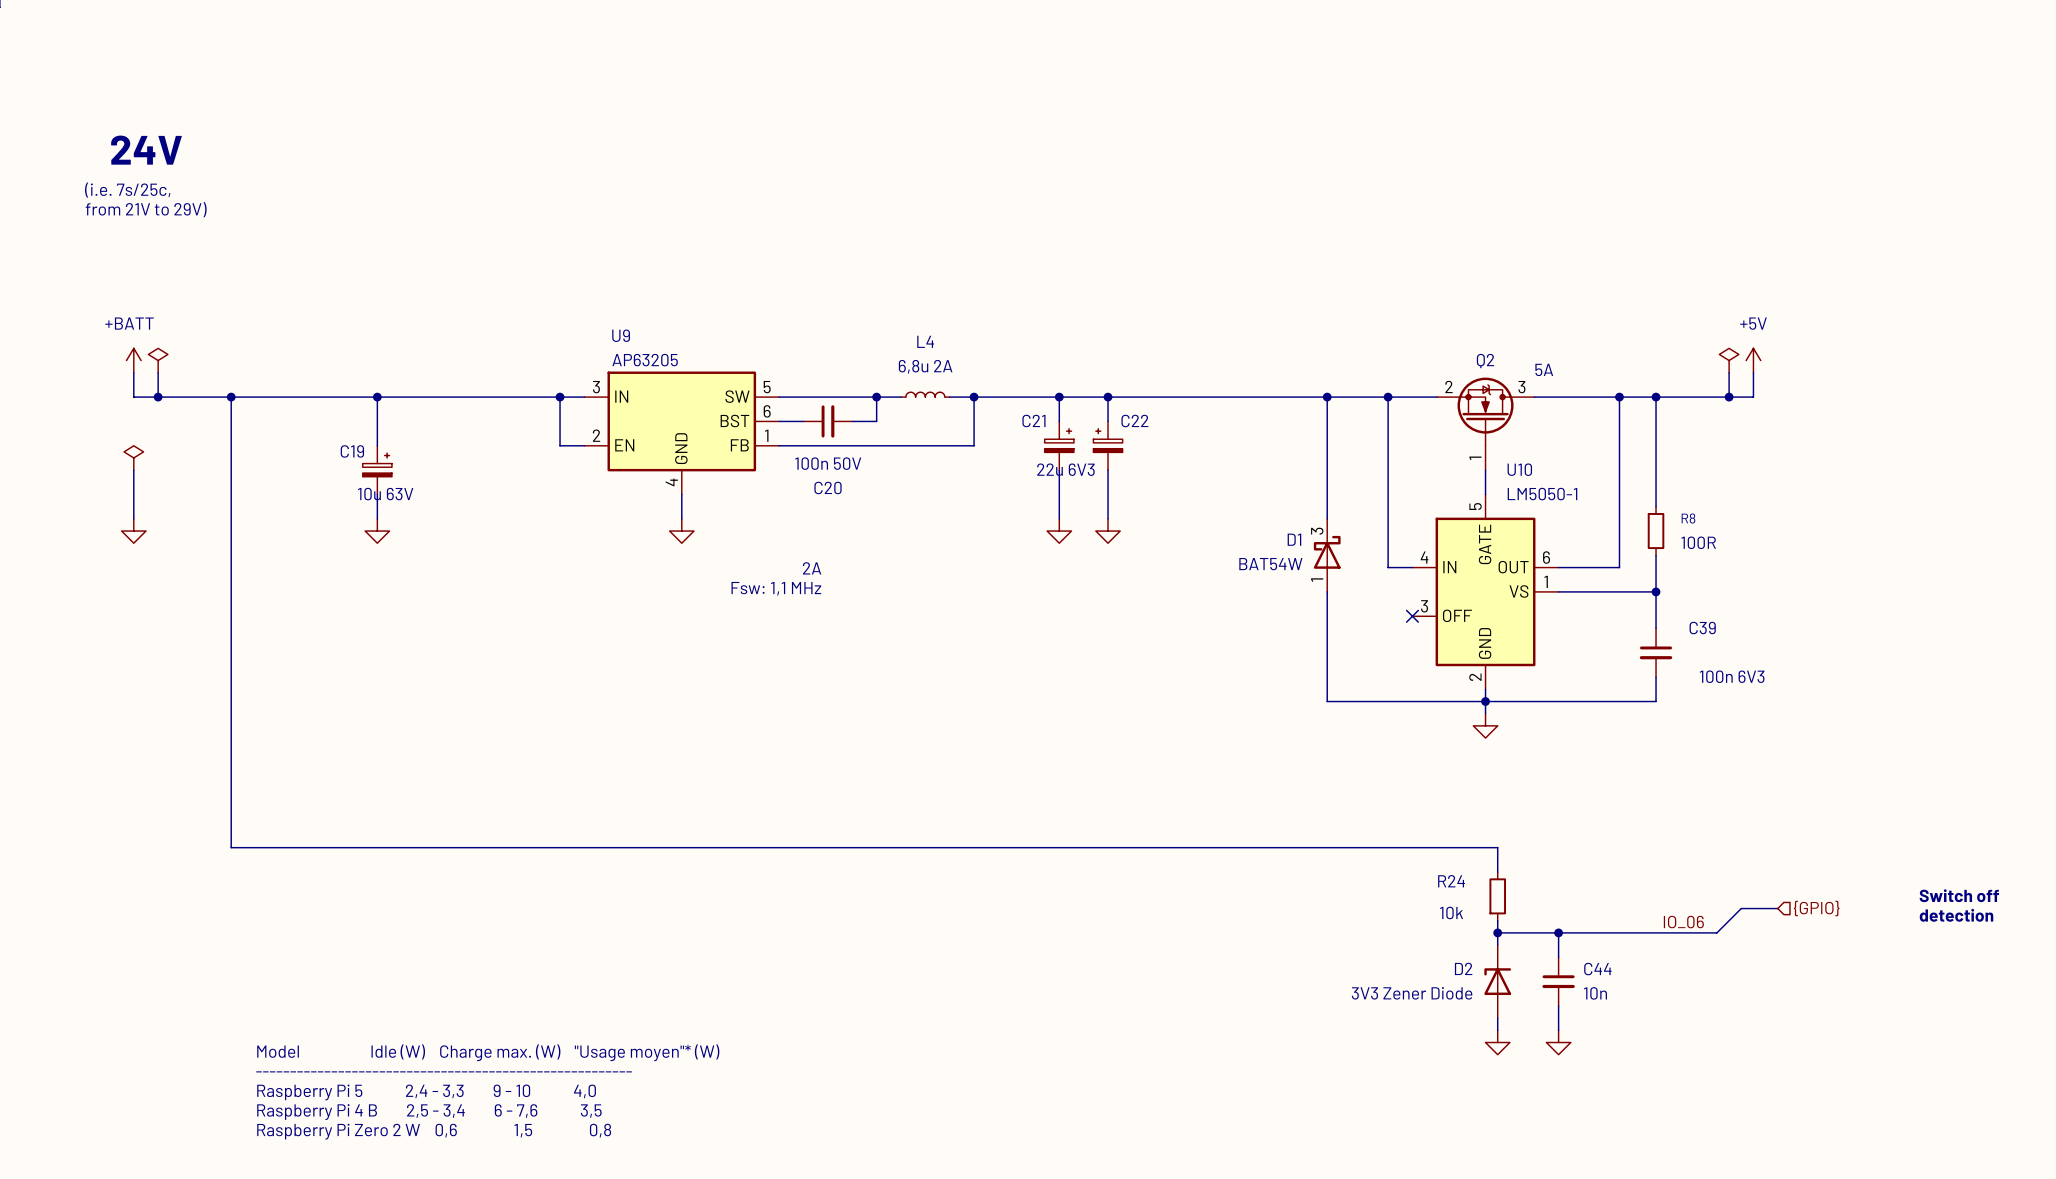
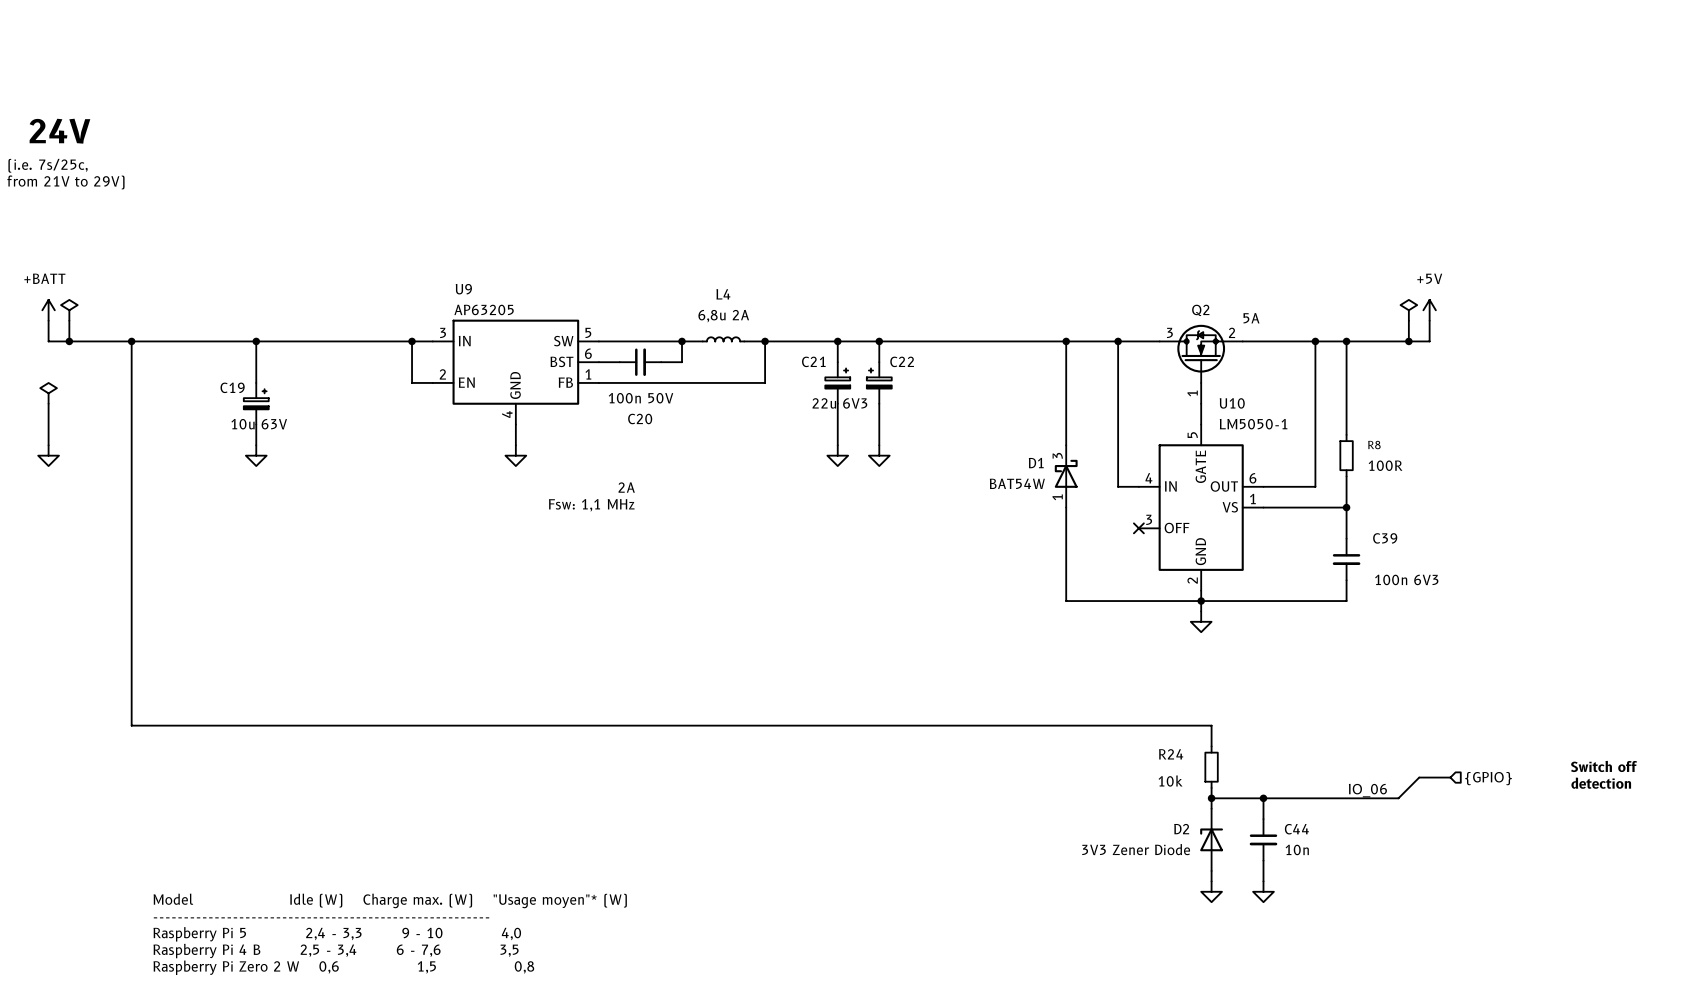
Q2 flip: as is (1485, 411) -> left-right (1201, 353)

